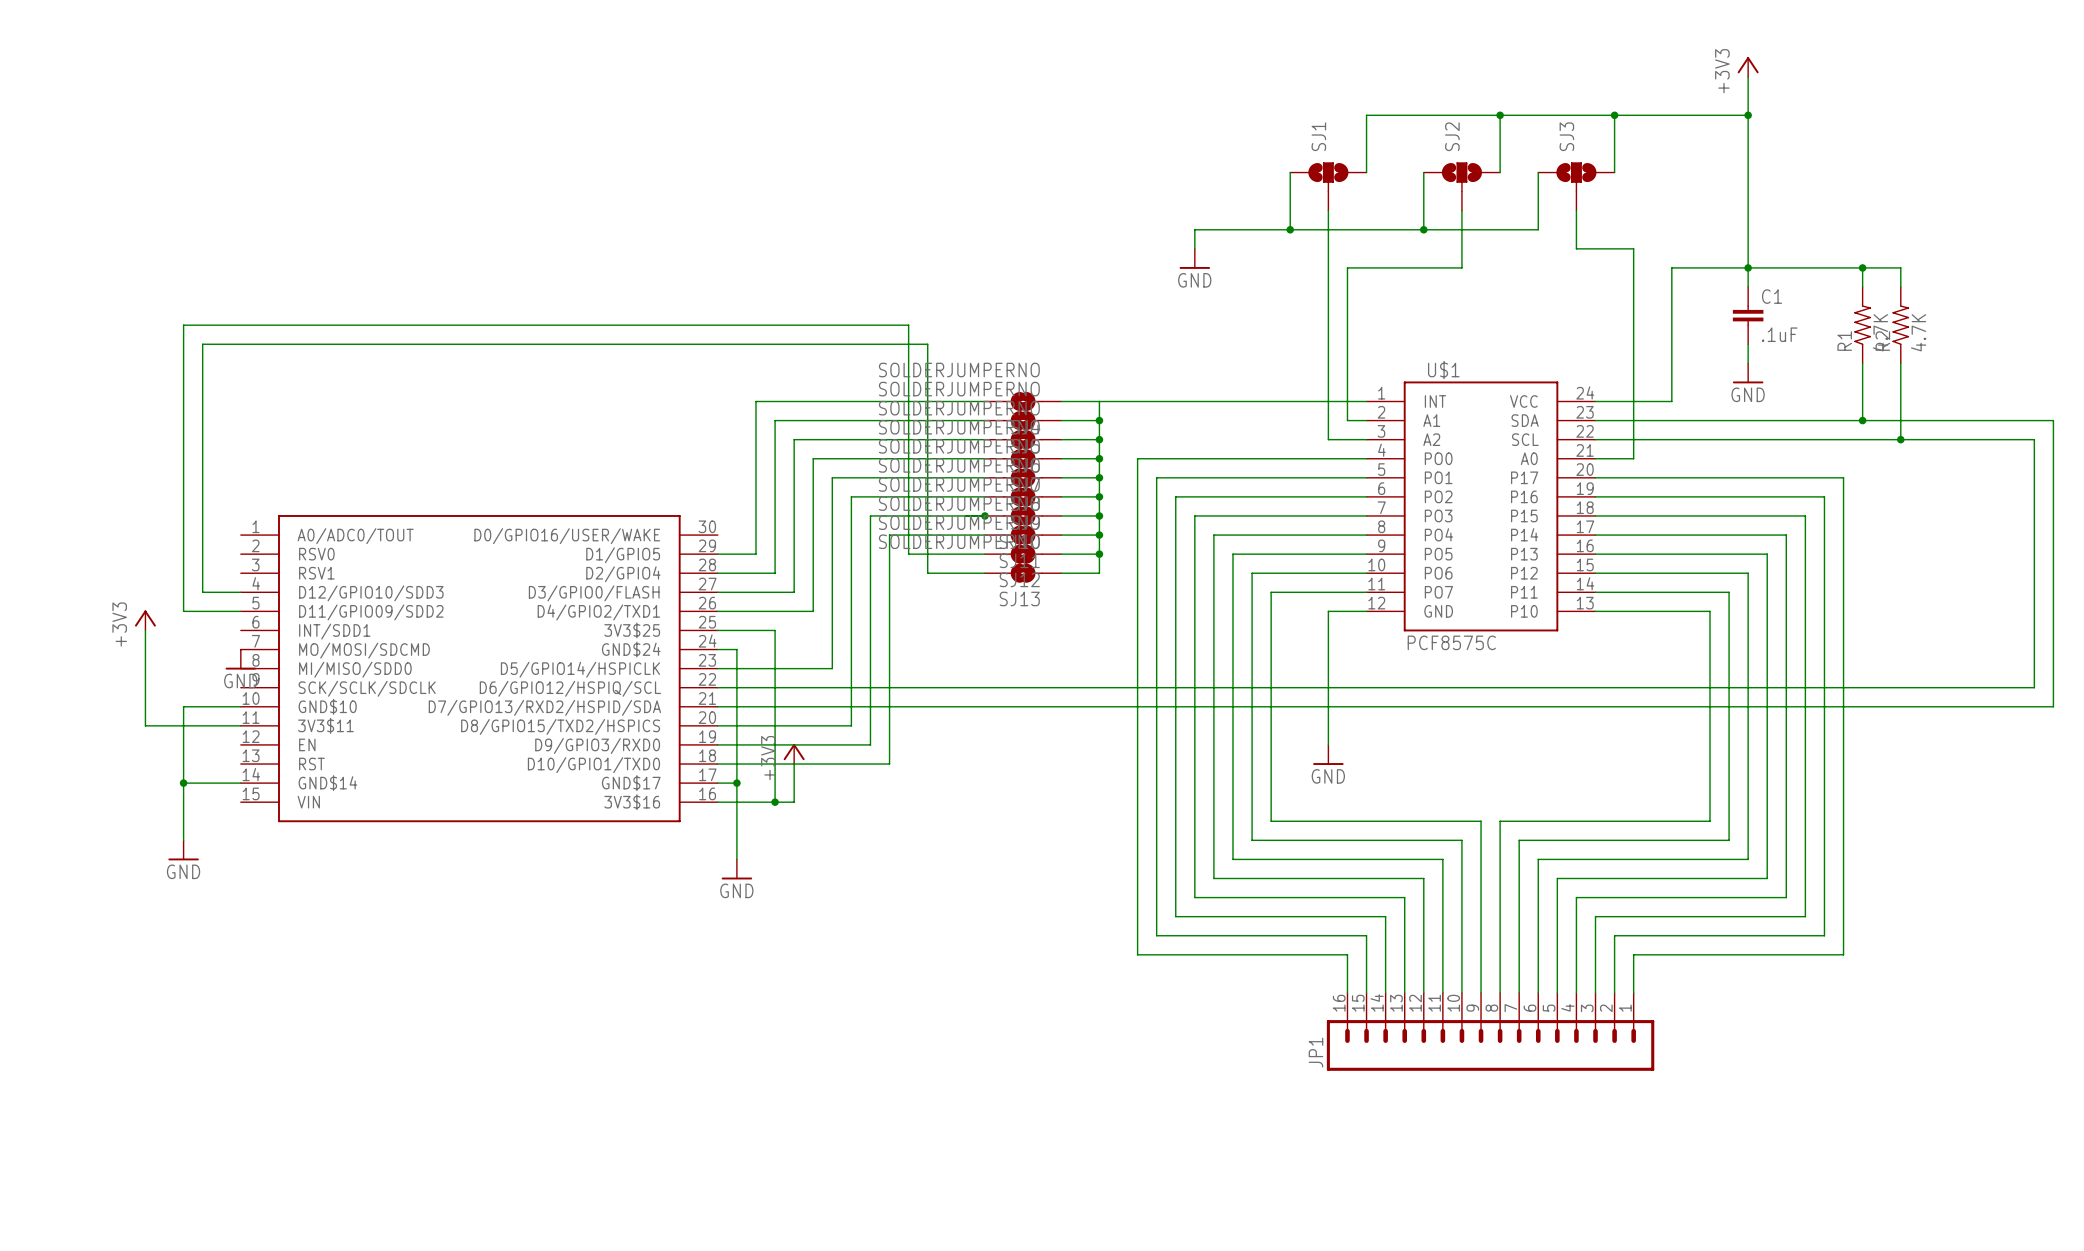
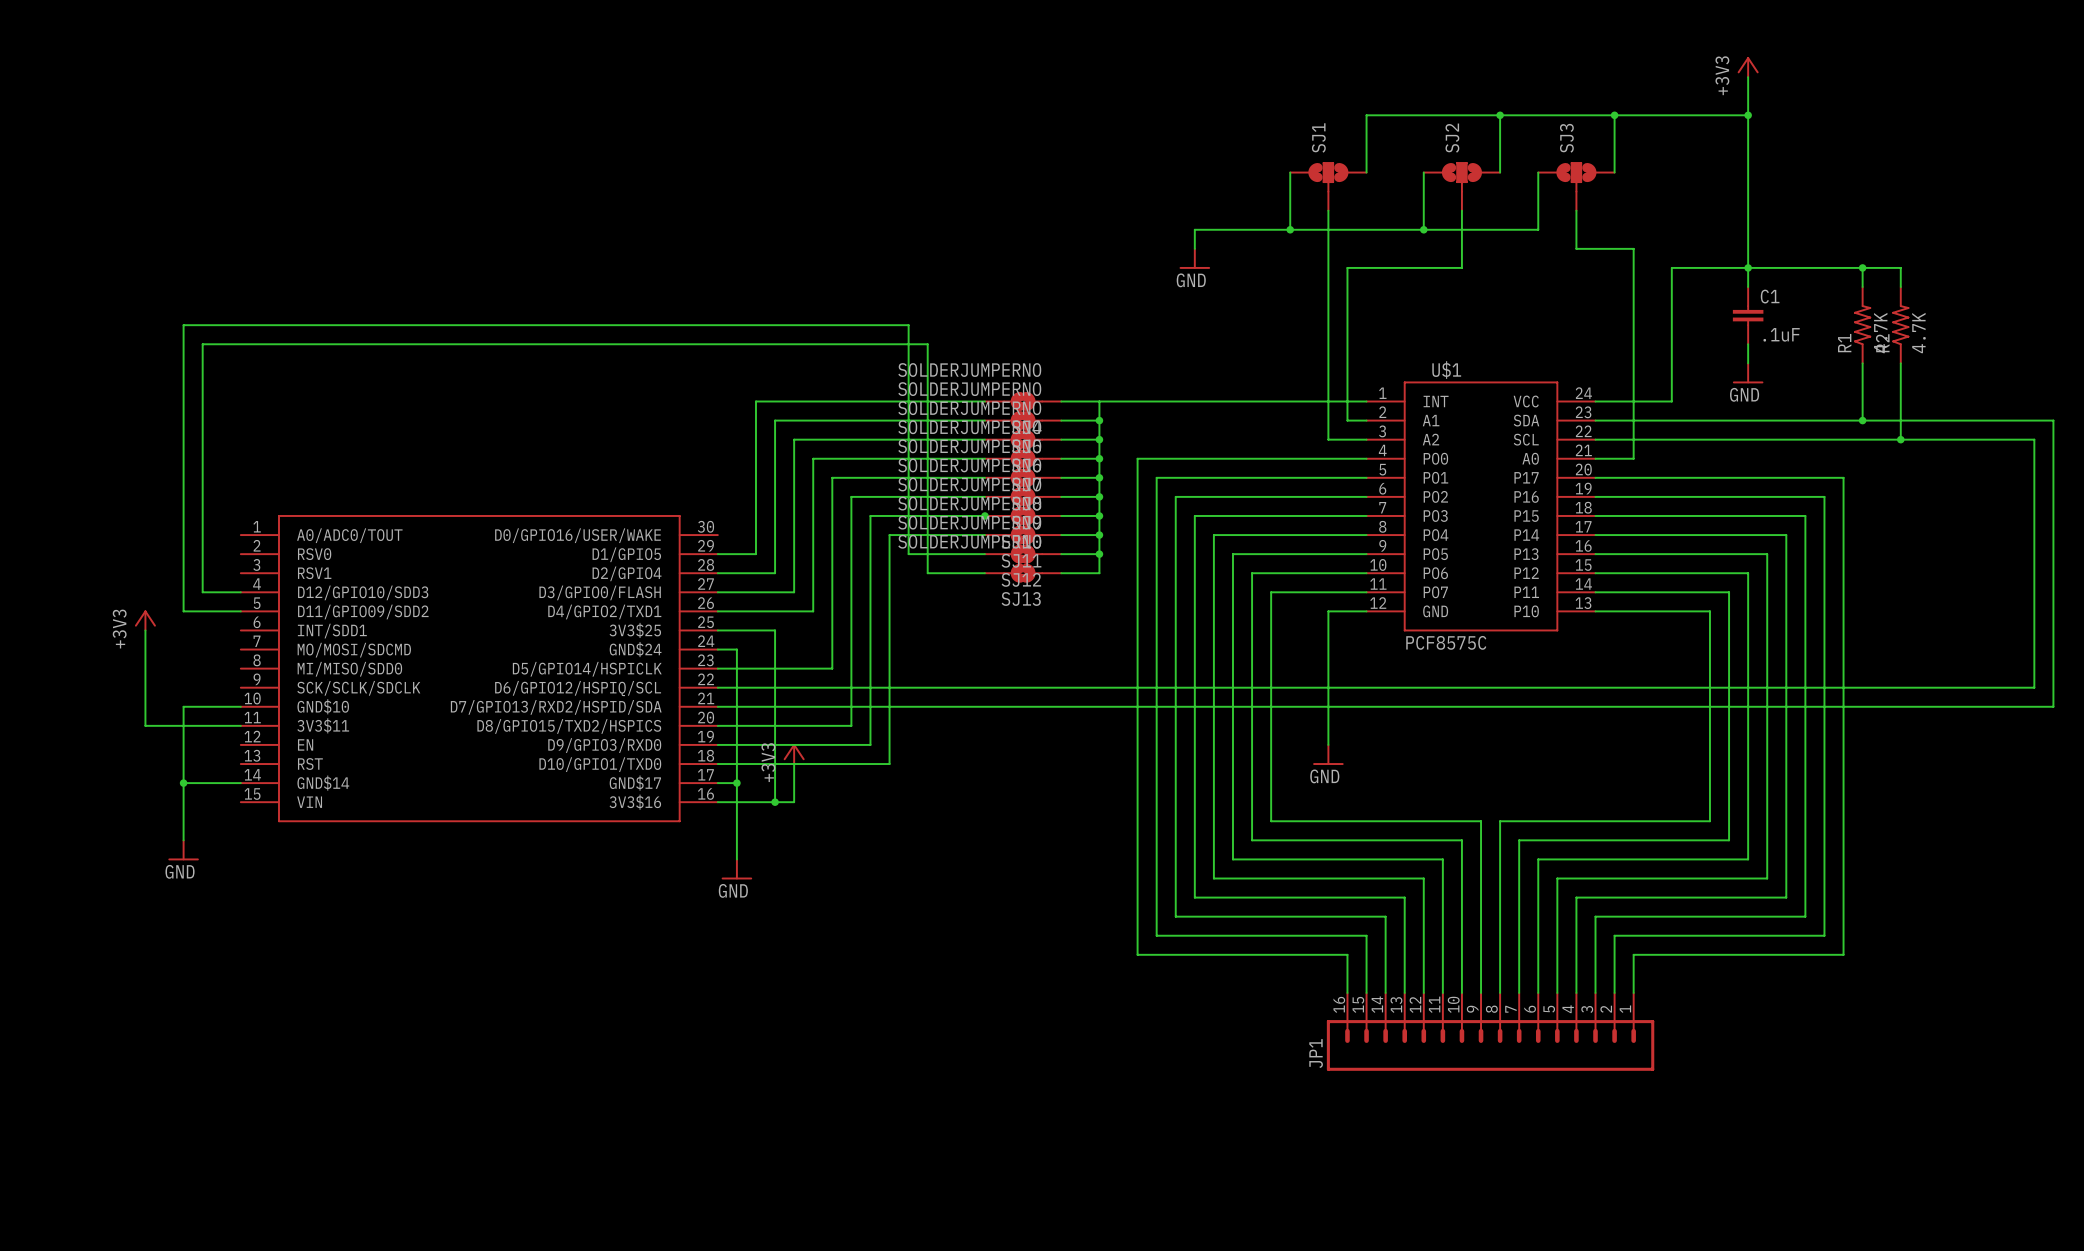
power symbol: GND (240, 659) -> none

